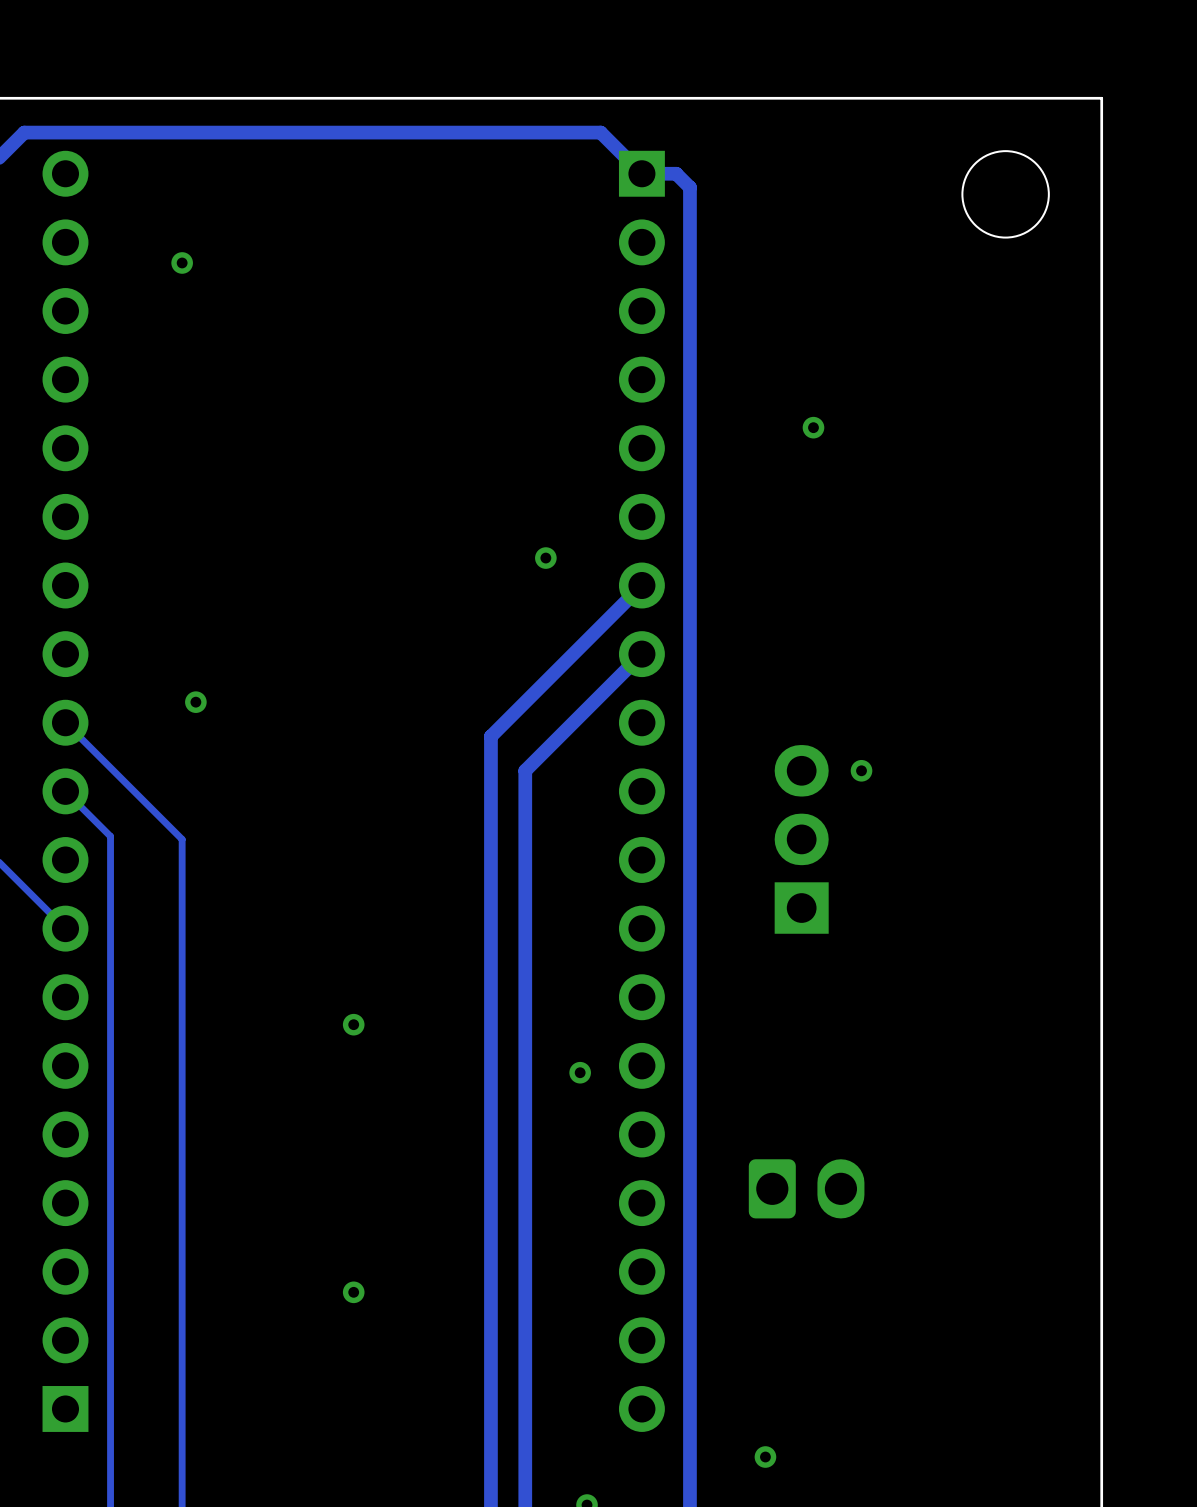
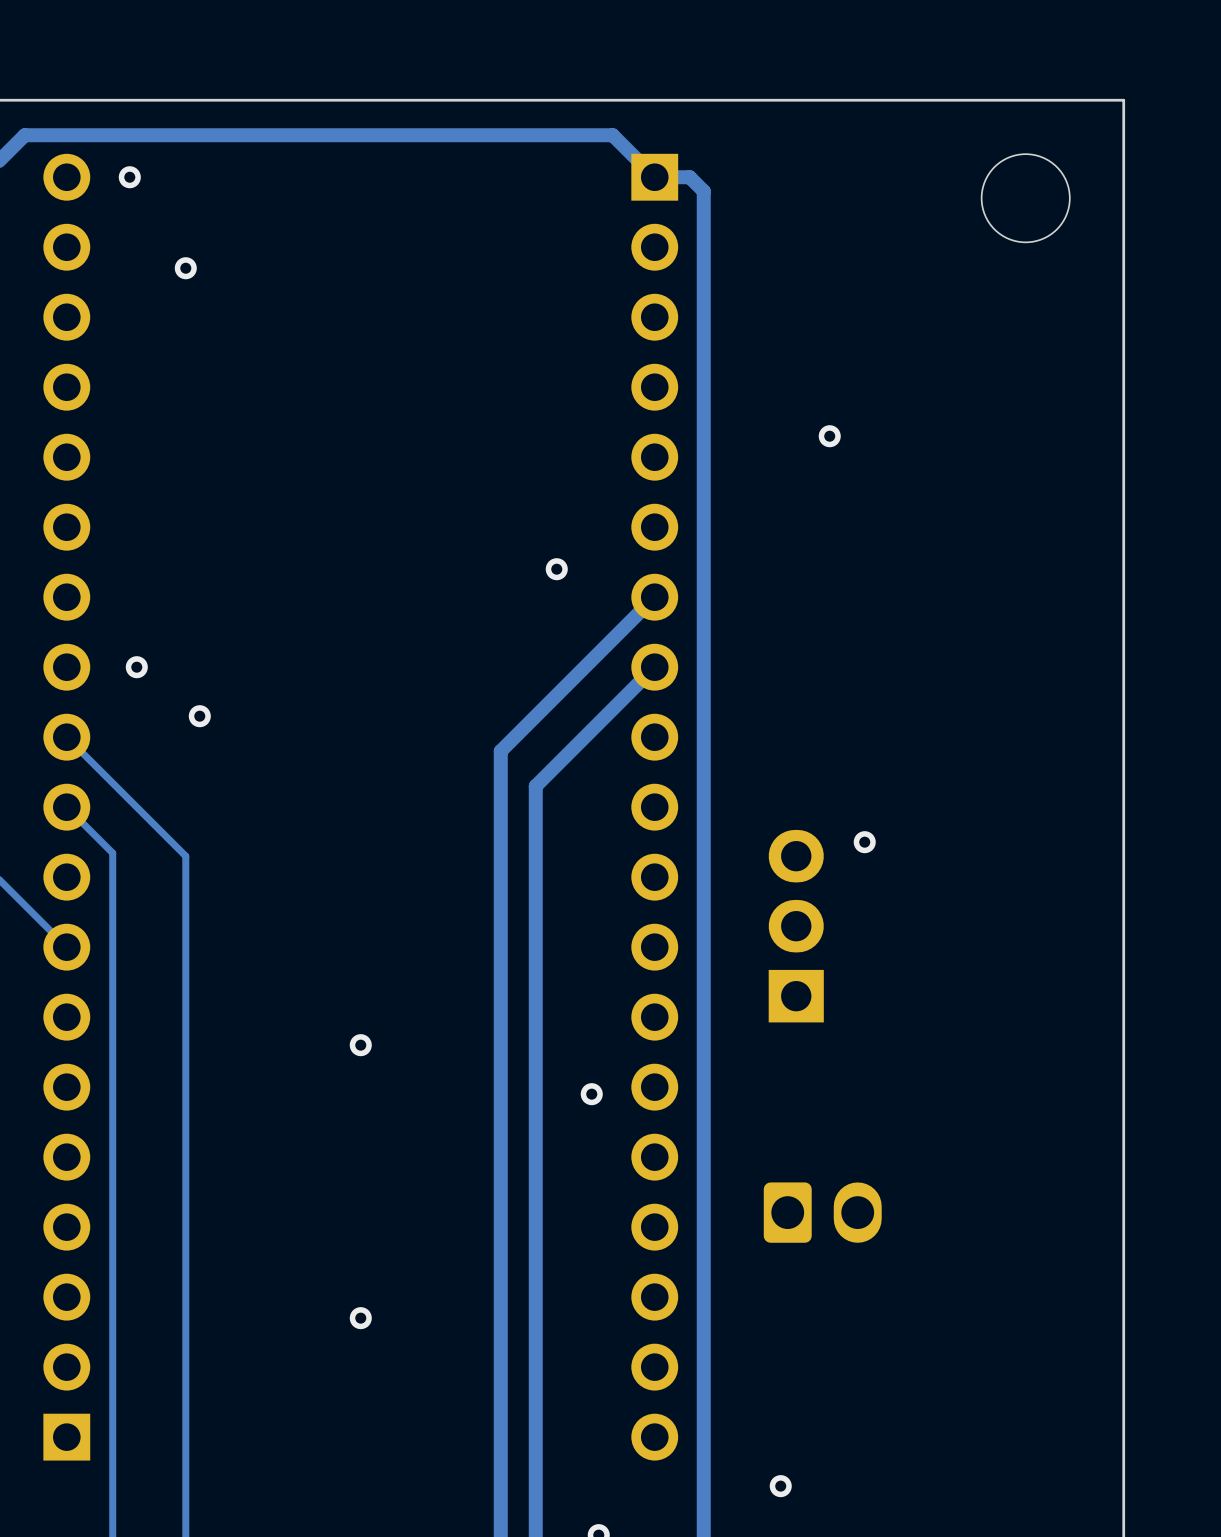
via: none -> (129, 177)
via: none -> (136, 667)
via position: (861, 770) -> (864, 842)
part position: (801, 839) -> (796, 926)

